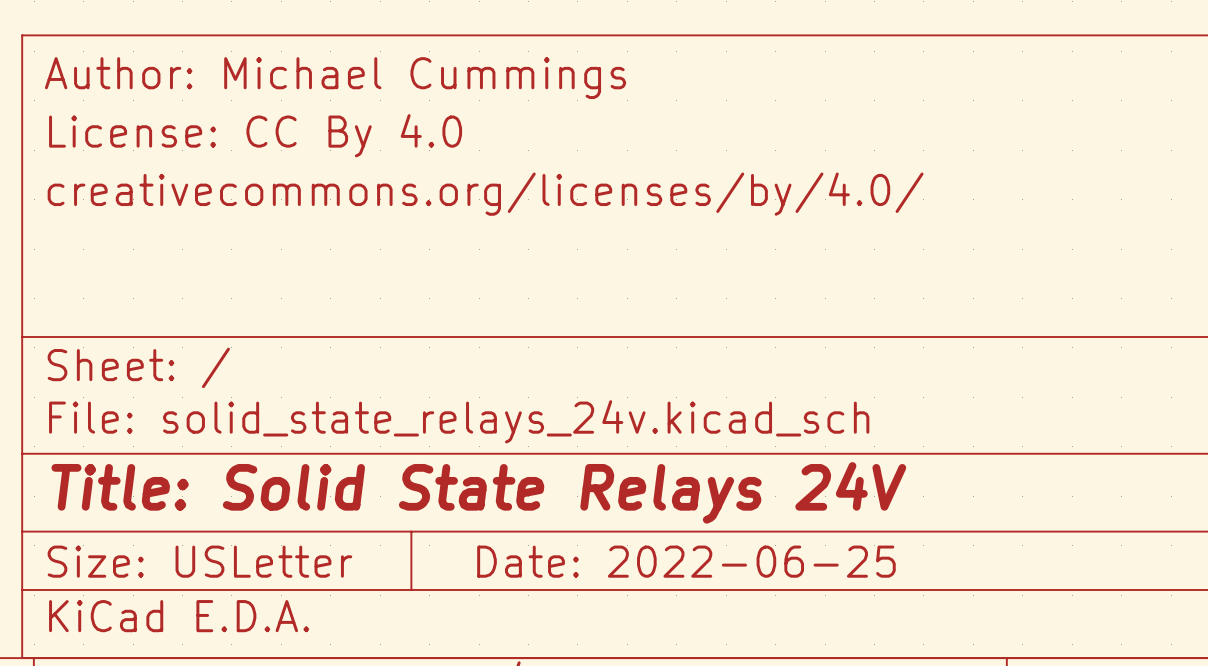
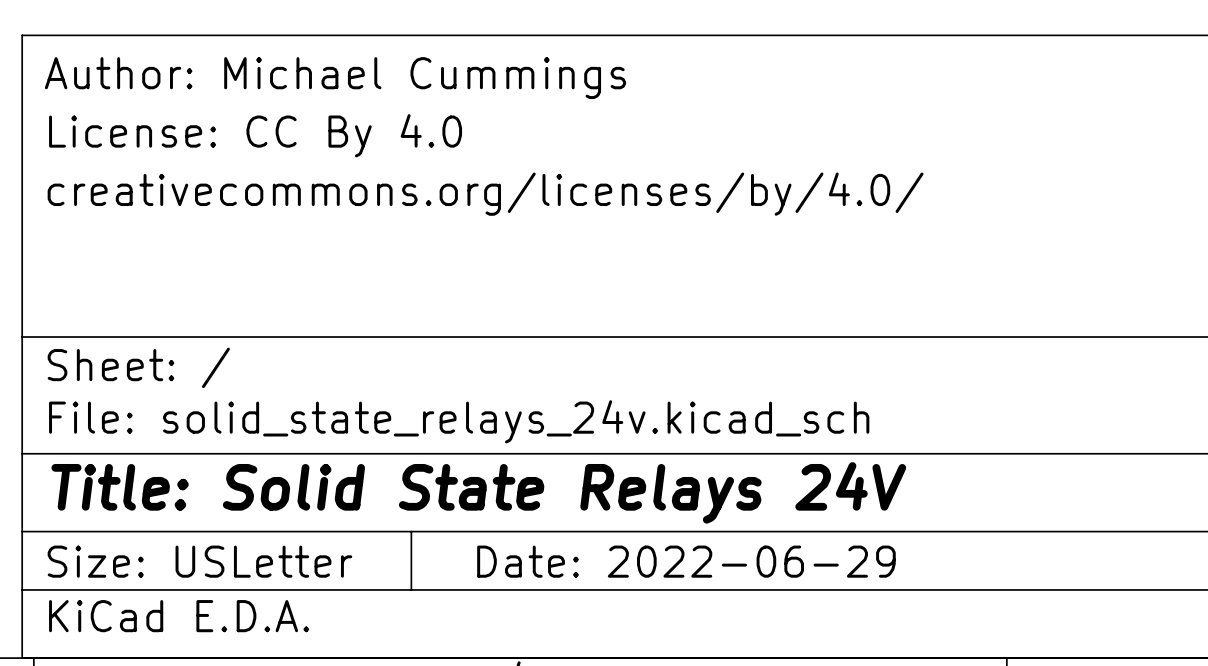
title block: Date: 2022-06-25 (686, 561) -> Date: 2022-06-29 (686, 561)

